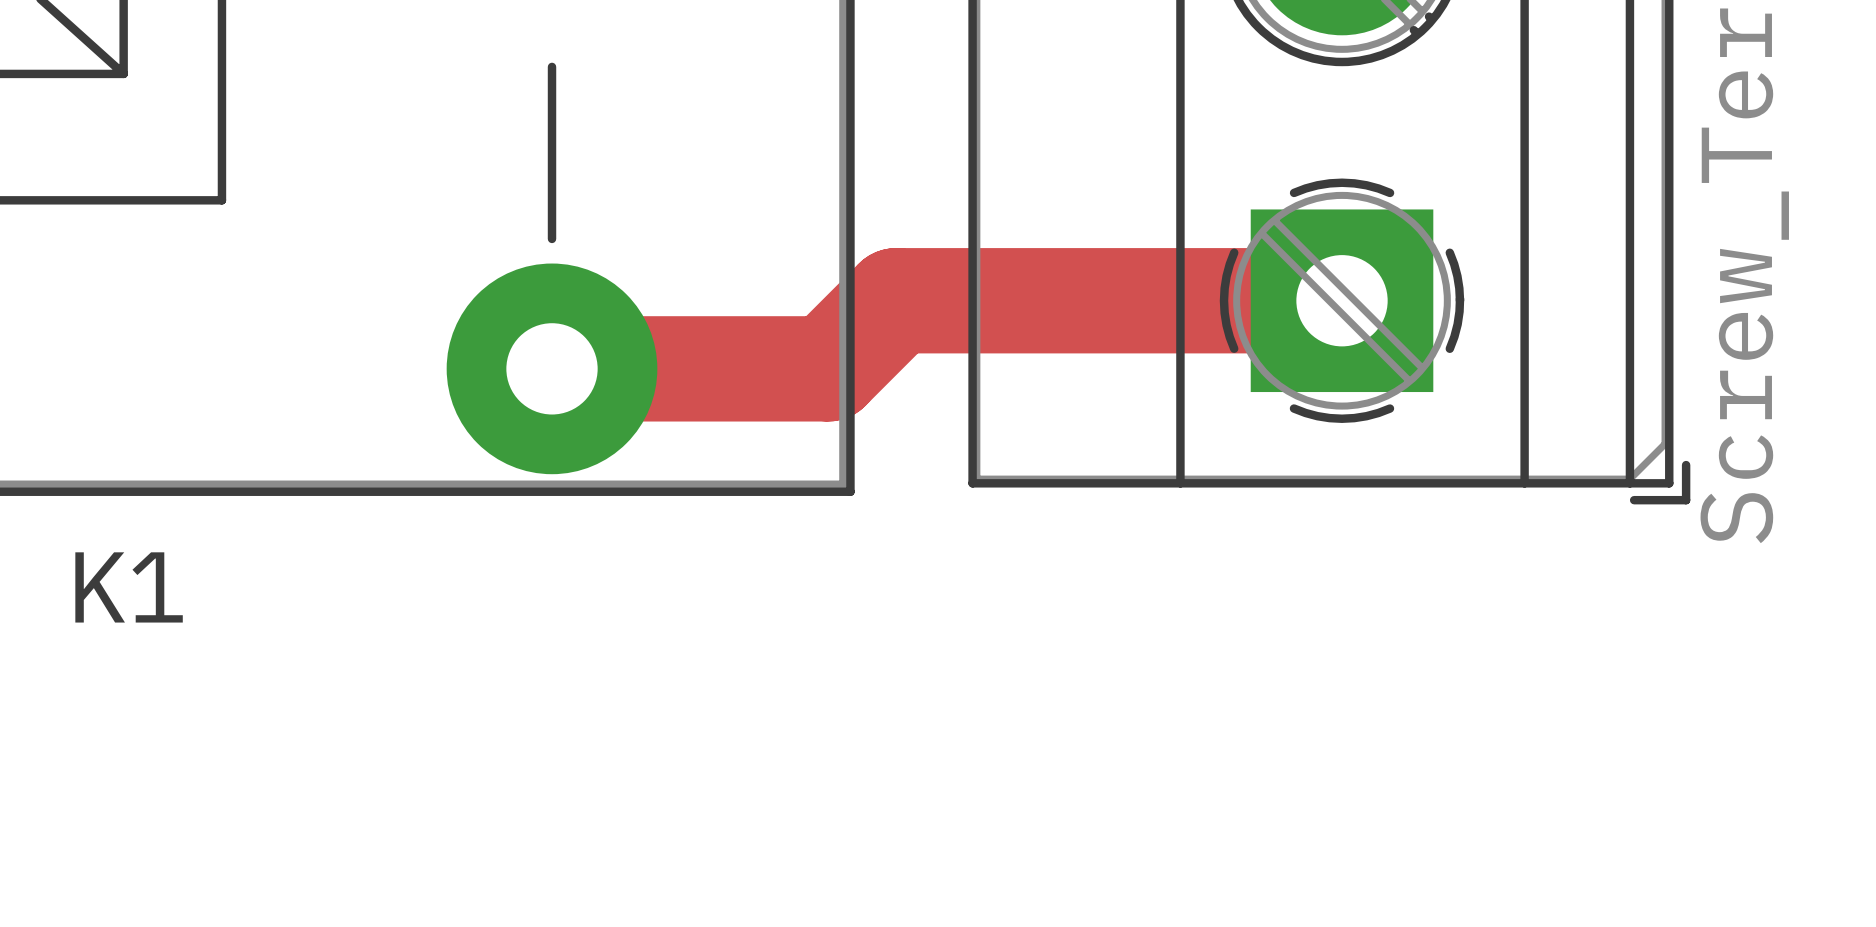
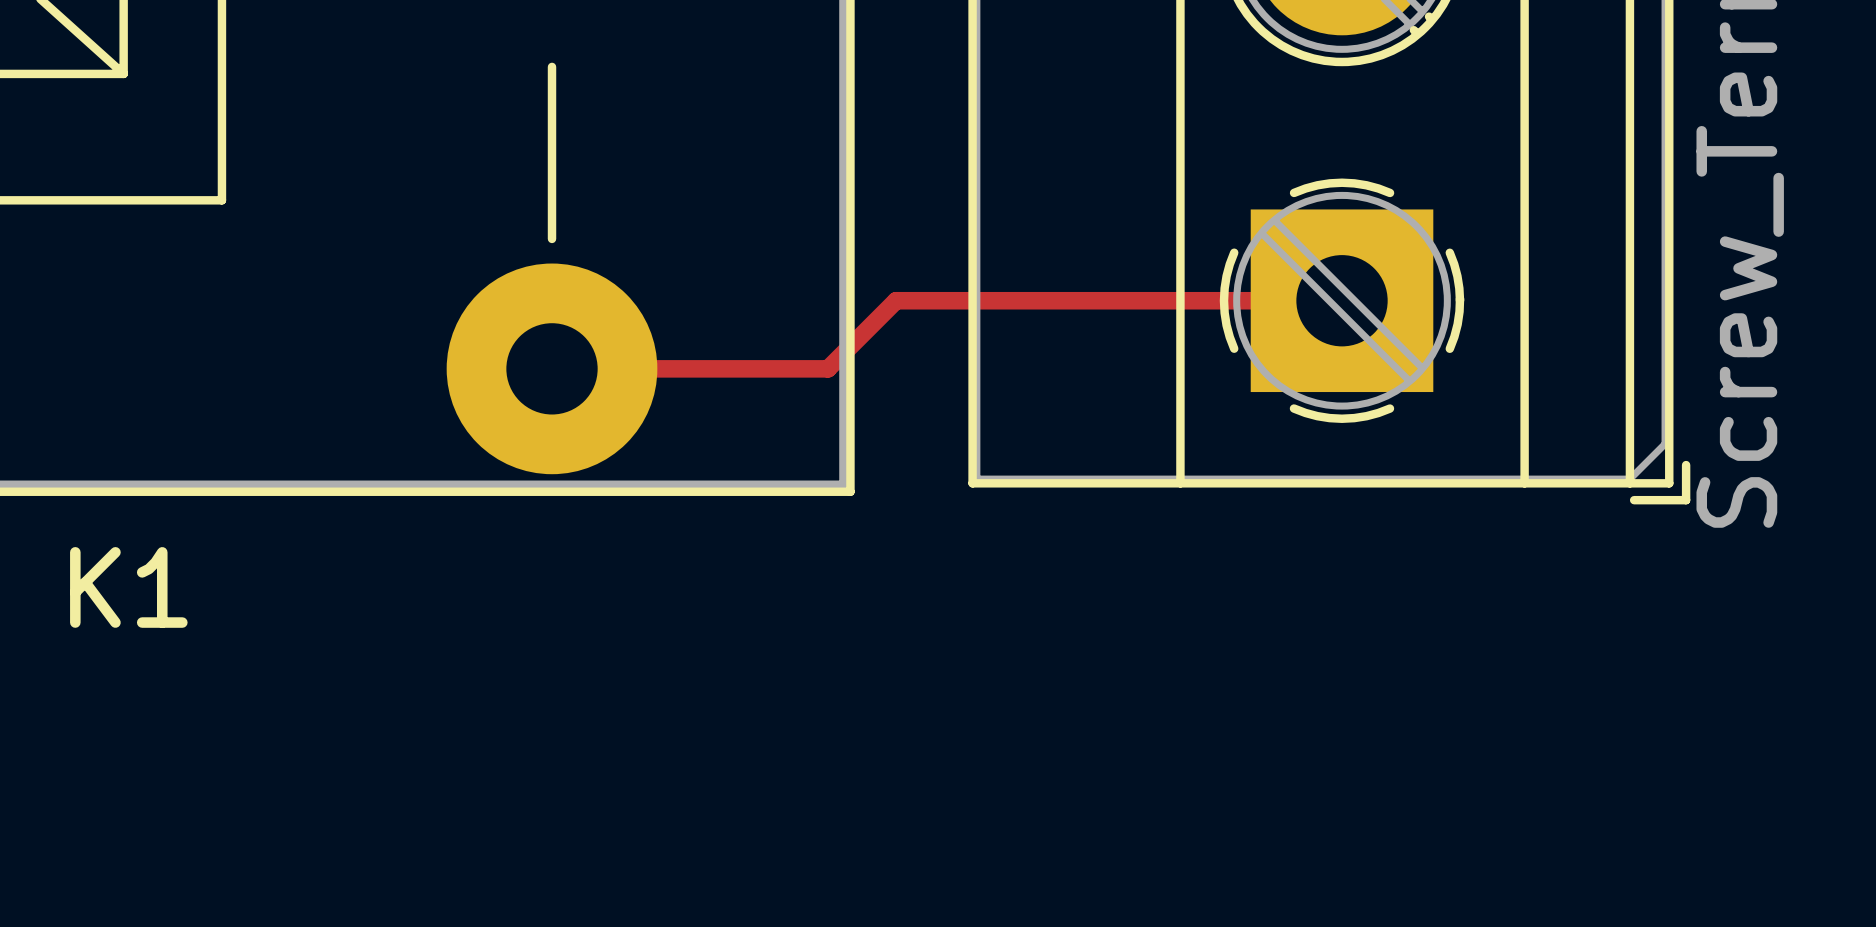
top track width: thick (1342, 300) (896, 300) (827, 368) (552, 368) -> thin (1342, 300) (896, 300) (827, 368) (552, 368)

